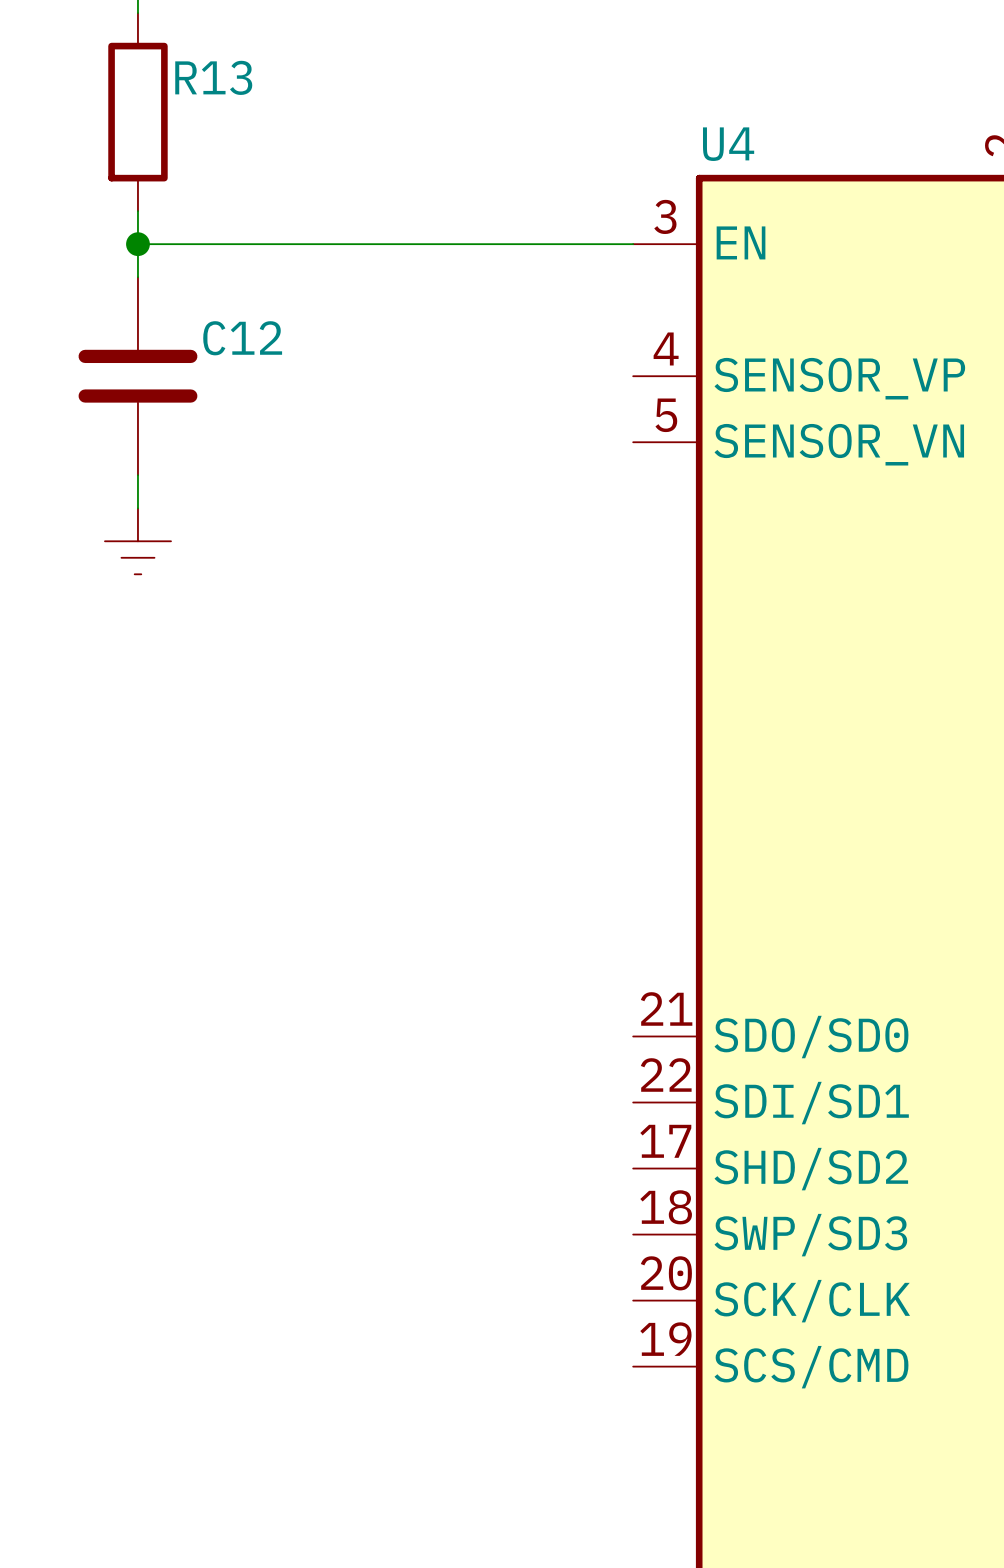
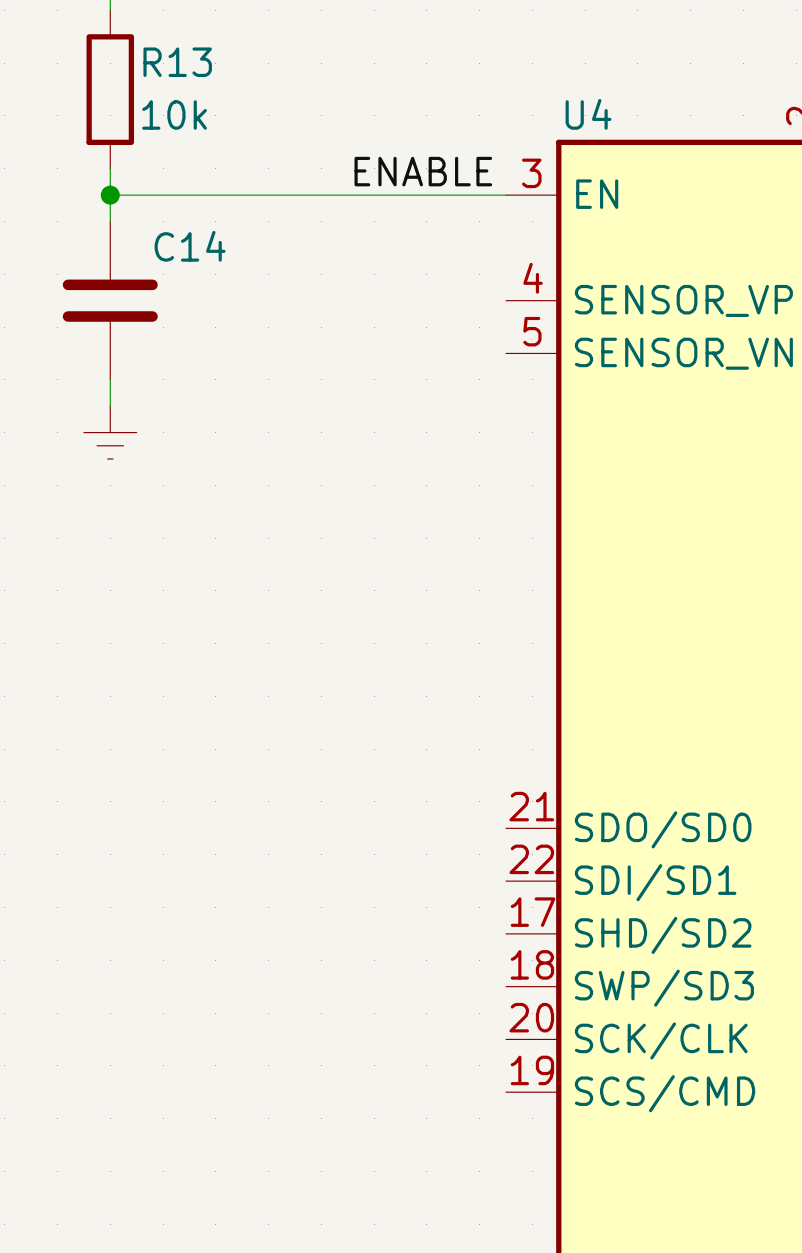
R13 value: none -> 10k (174, 115)
label: none -> ENABLE (423, 171)
C12 name: C12 (242, 338) -> C14 (190, 246)

